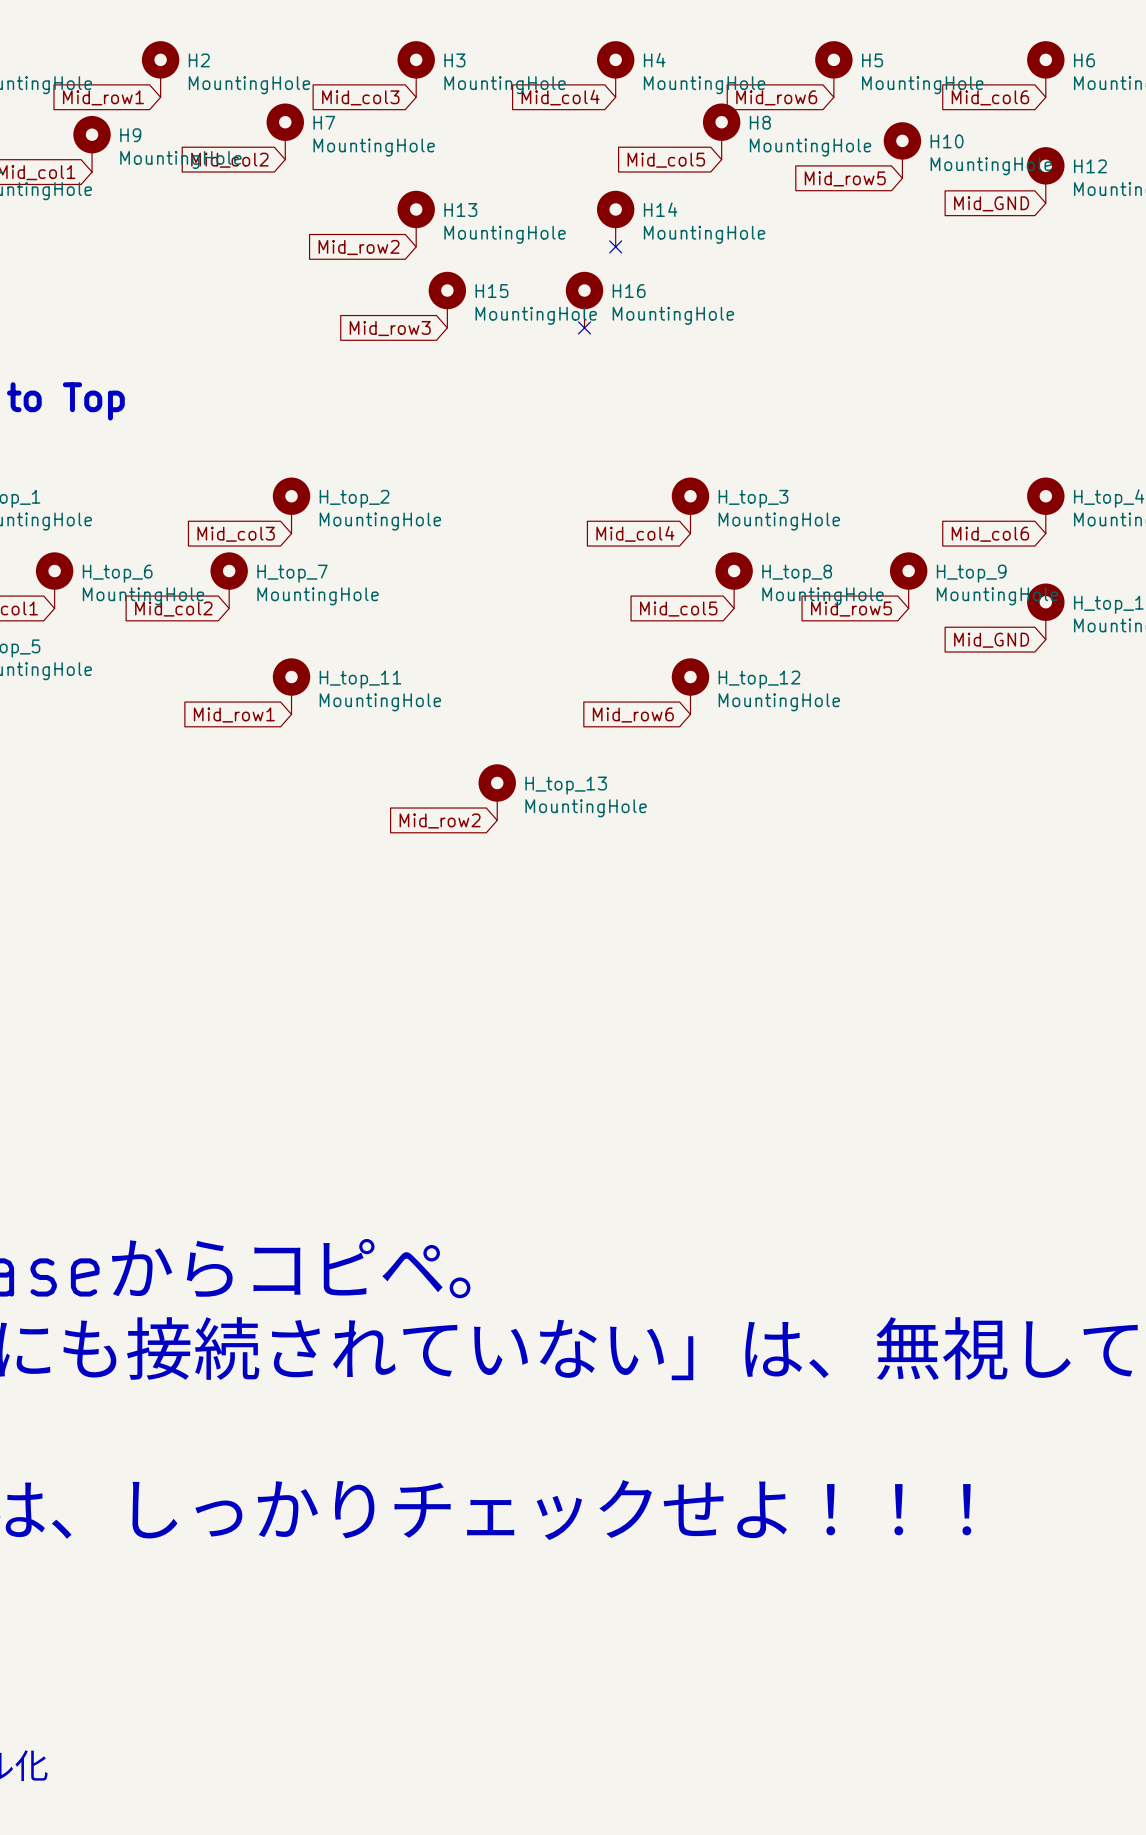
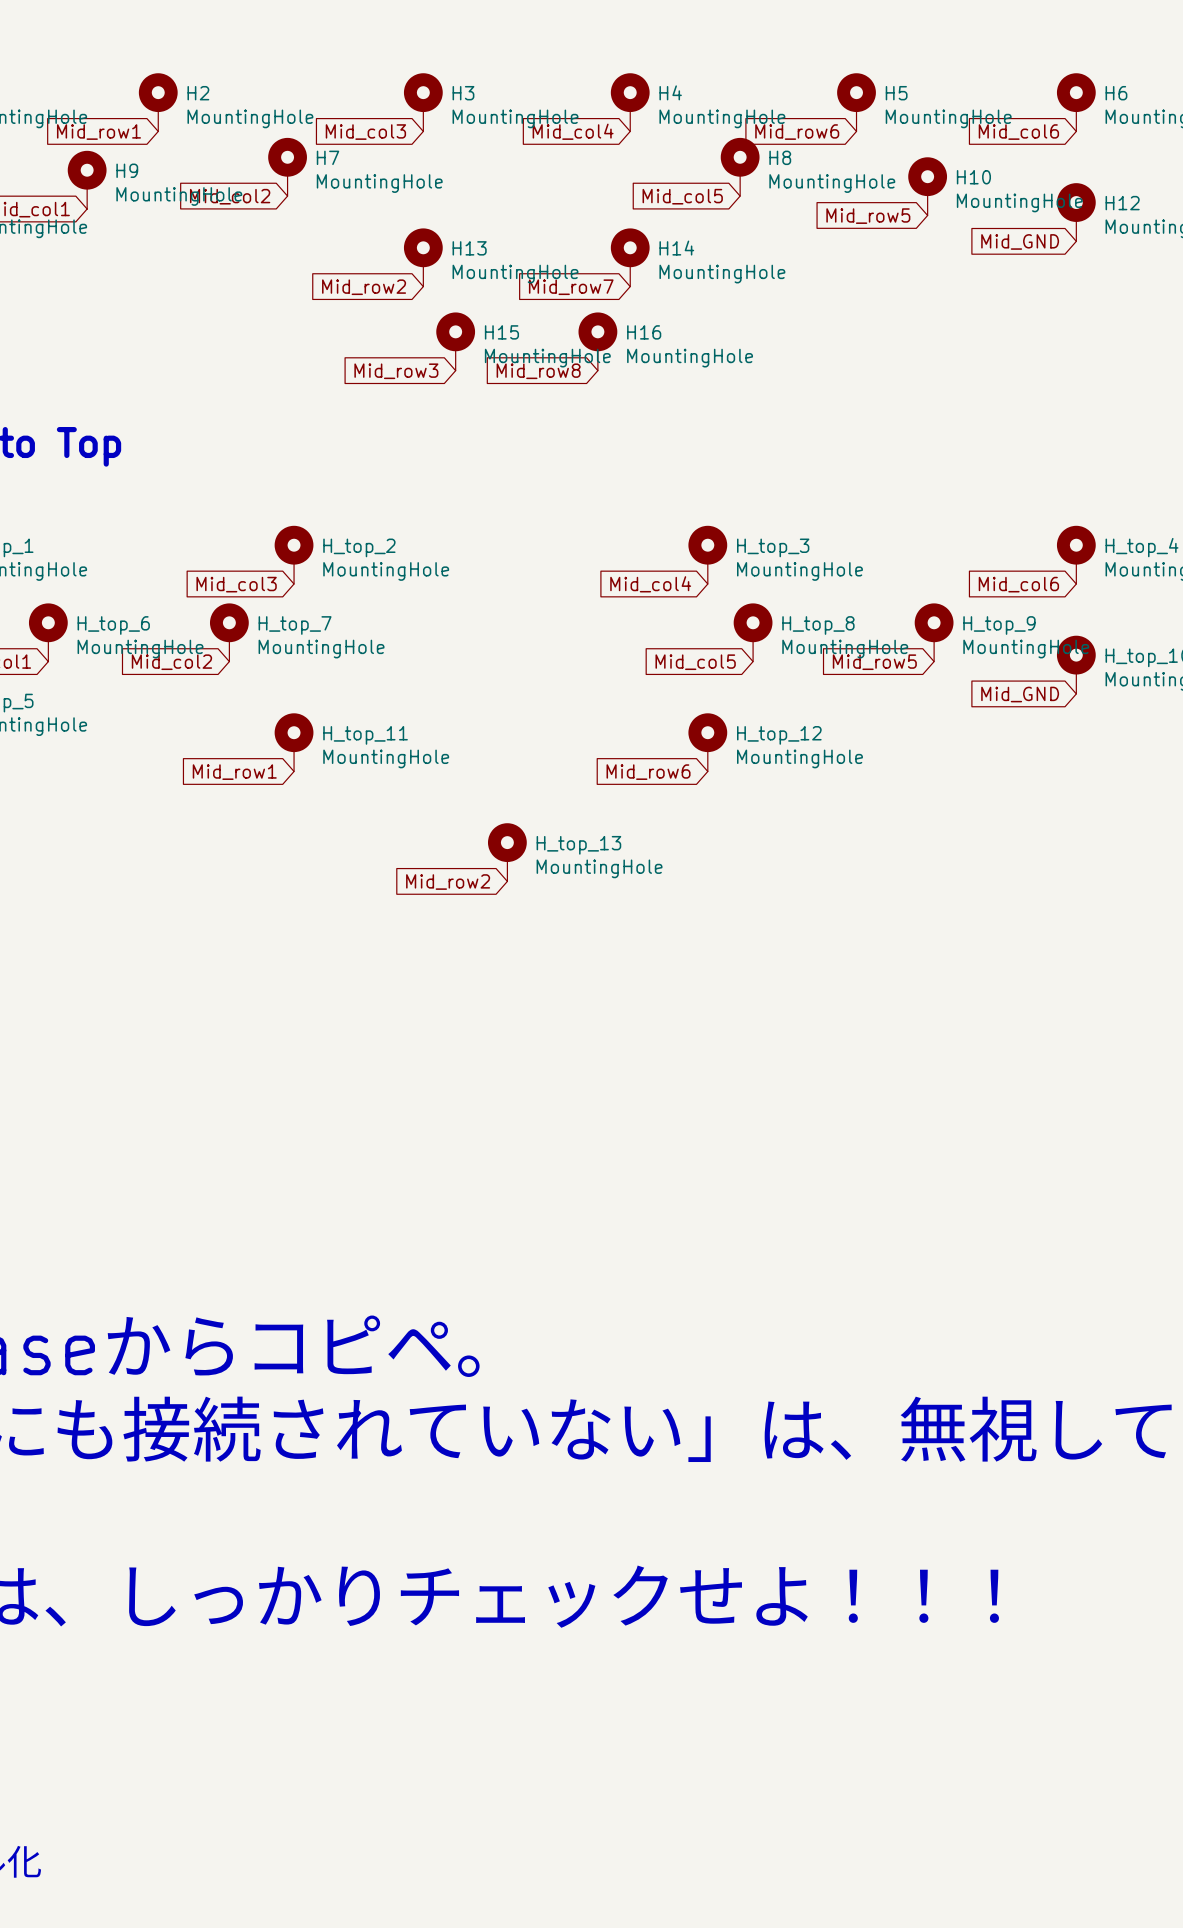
no-connect mark: (615, 246) -> none
global label: none -> Mid_row7 (571, 287)
no-connect mark: (584, 327) -> none
global label: none -> Mid_row8 (538, 371)

